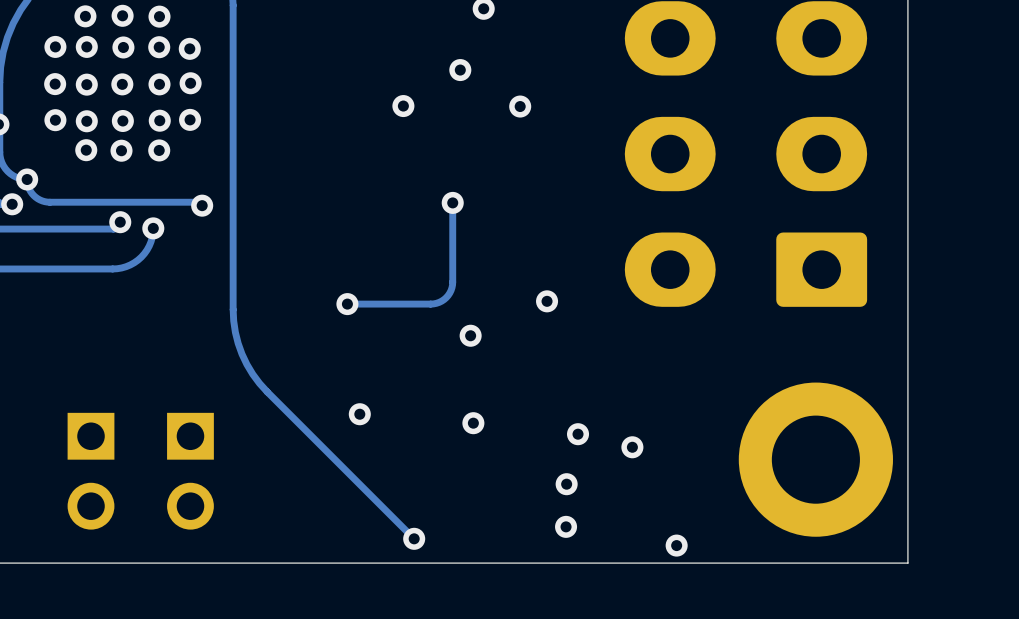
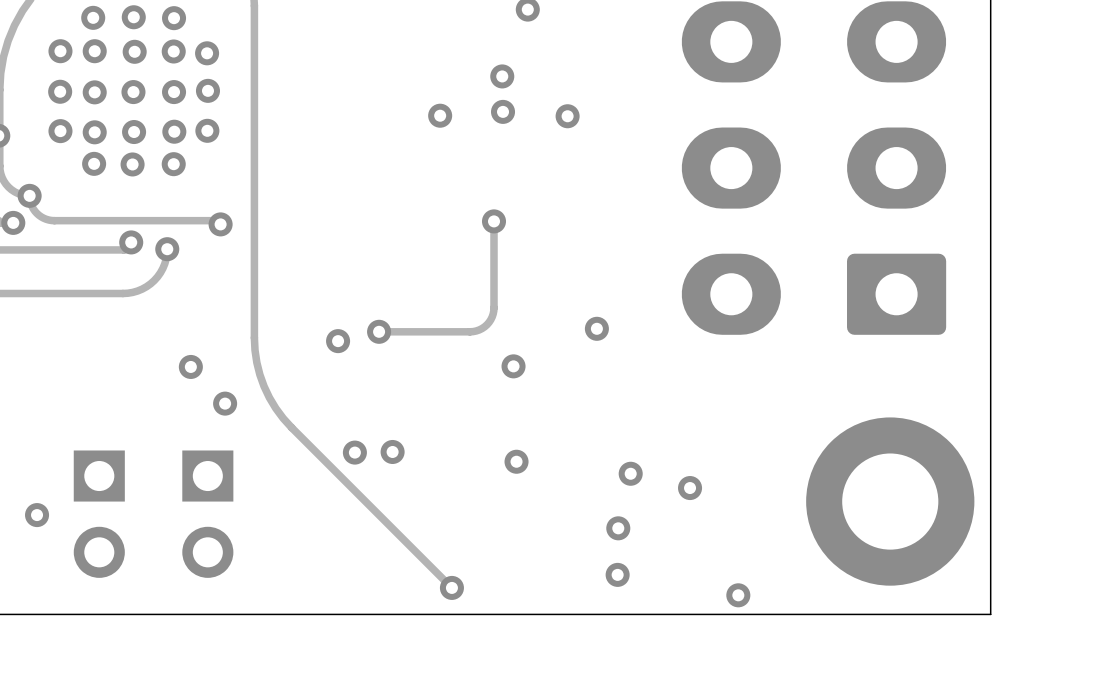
via: none -> (503, 111)
via: none -> (338, 341)
via: none -> (190, 366)
via: none -> (225, 403)
via: none -> (354, 452)
via: none -> (37, 515)

